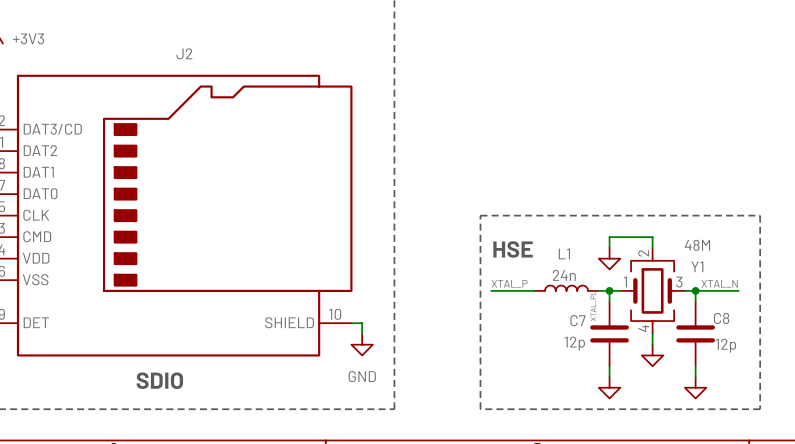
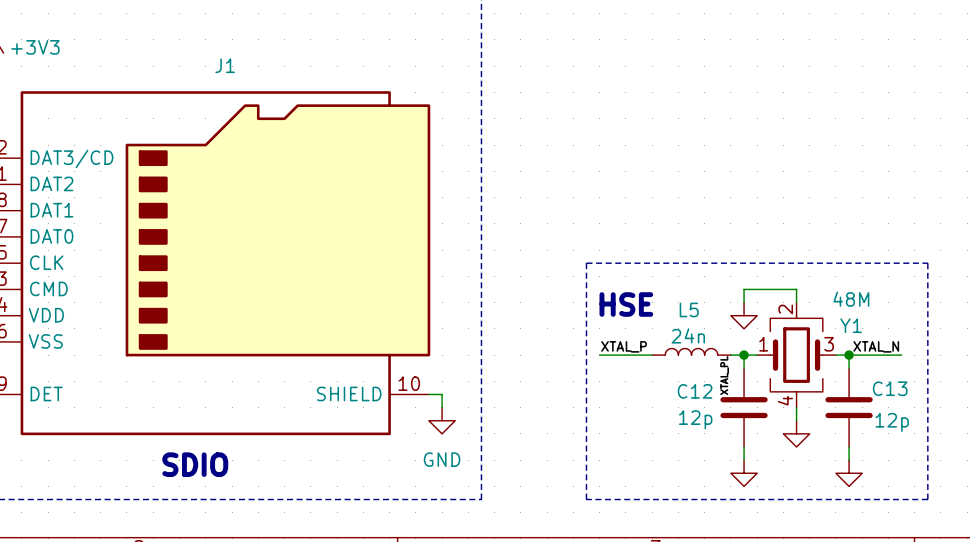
J2 name: J2 (184, 53) -> J1 (225, 65)
L1 name: L1 (564, 253) -> L5 (689, 309)
C8 name: C8 (721, 318) -> C13 (890, 388)
C7 name: C7 (577, 320) -> C12 (695, 391)

